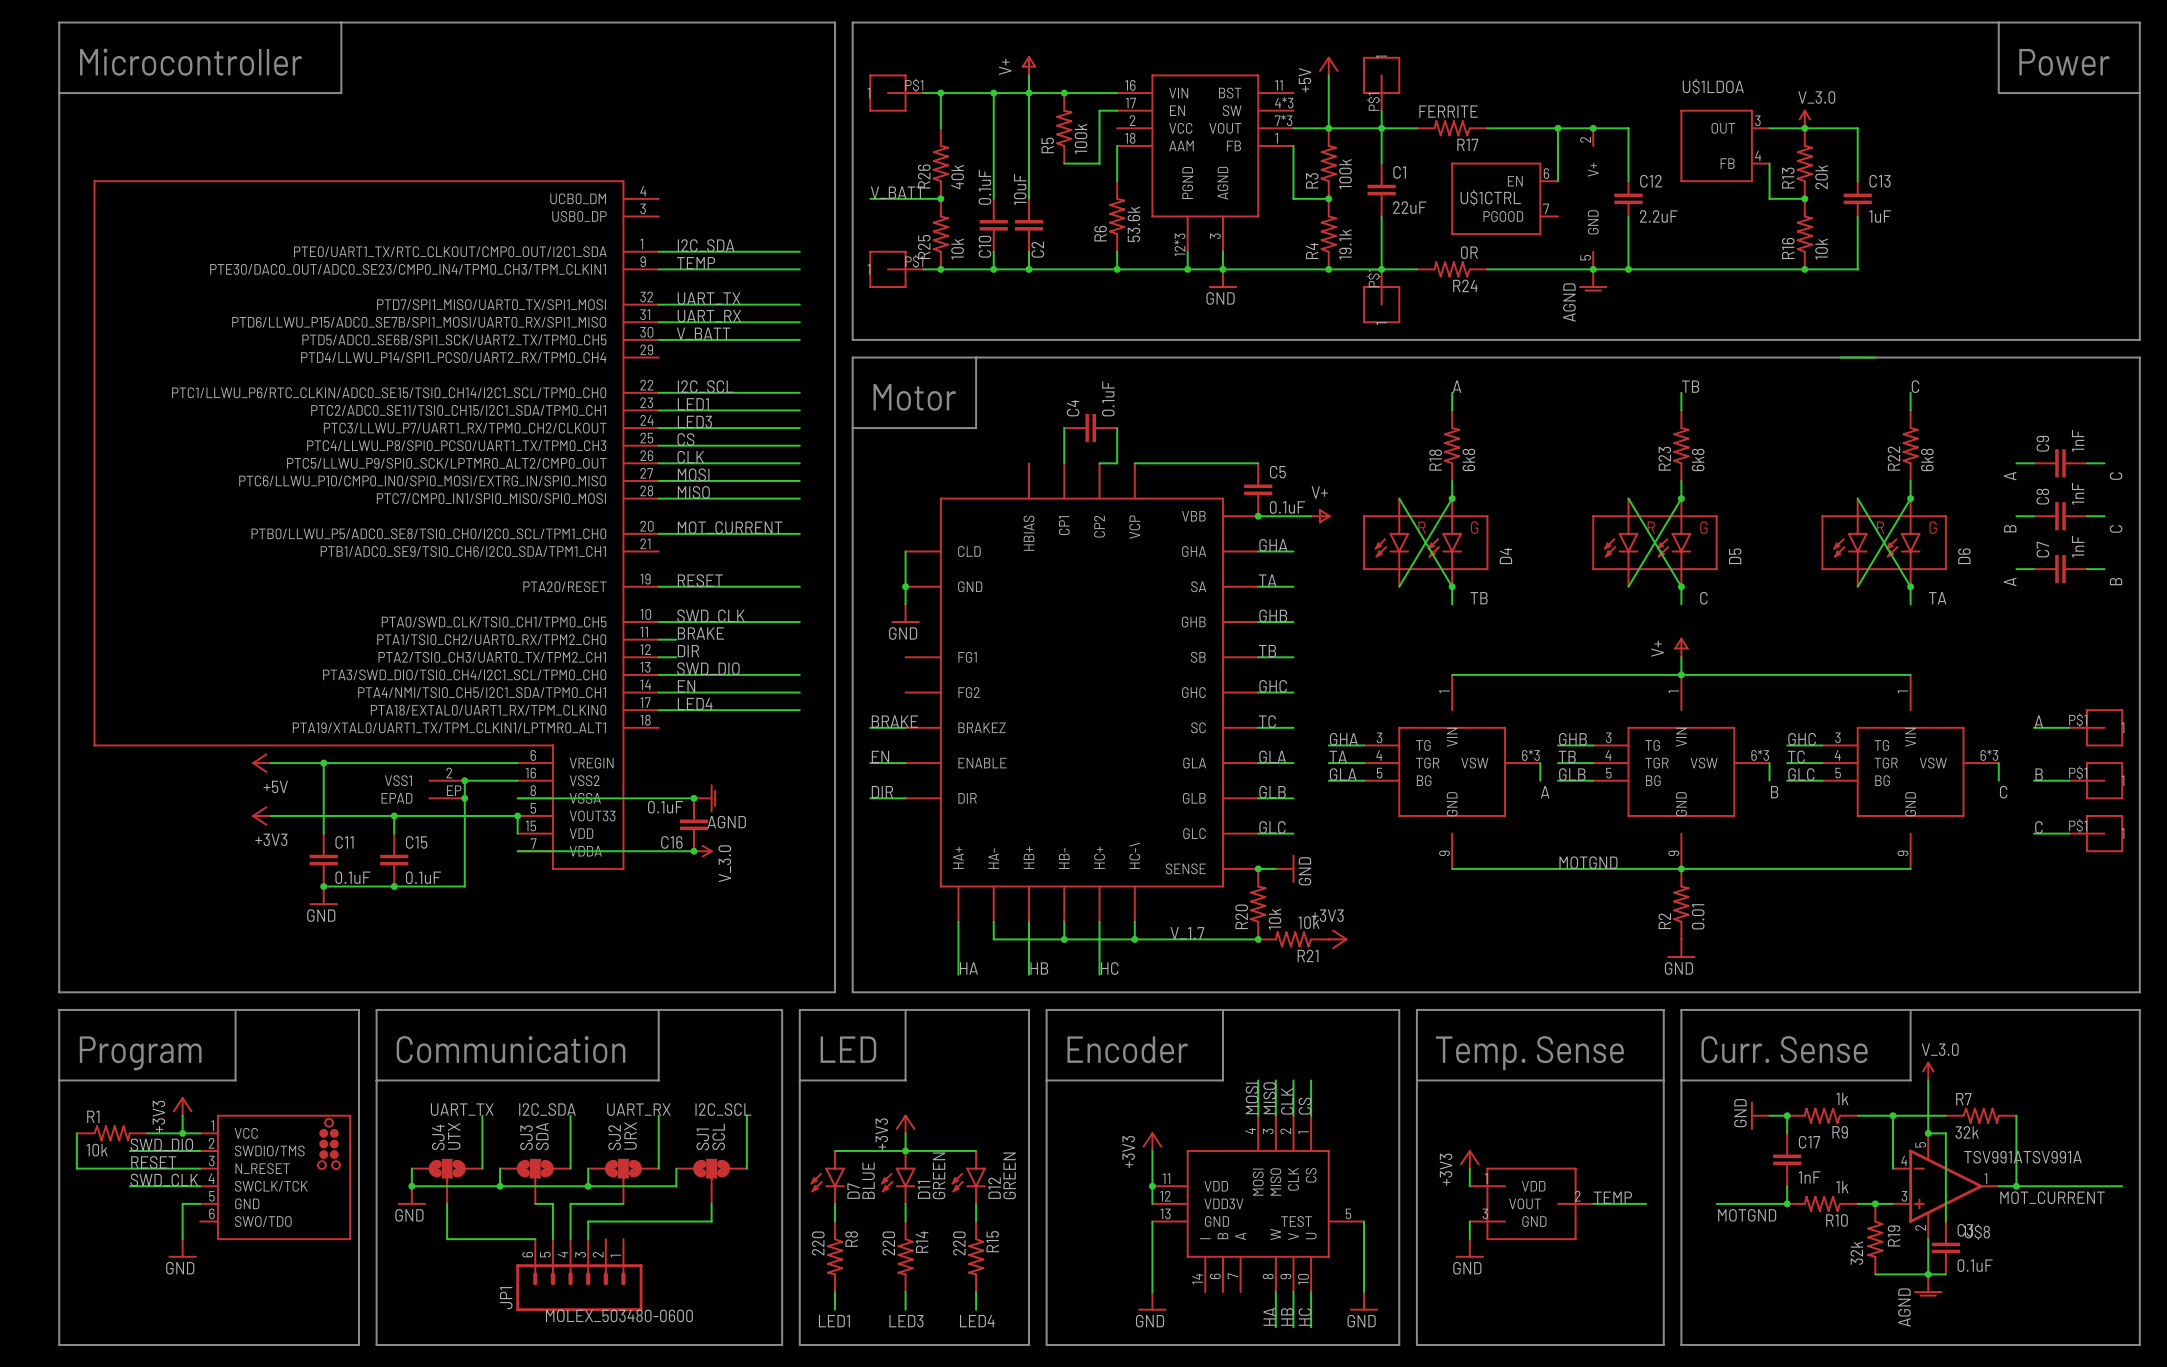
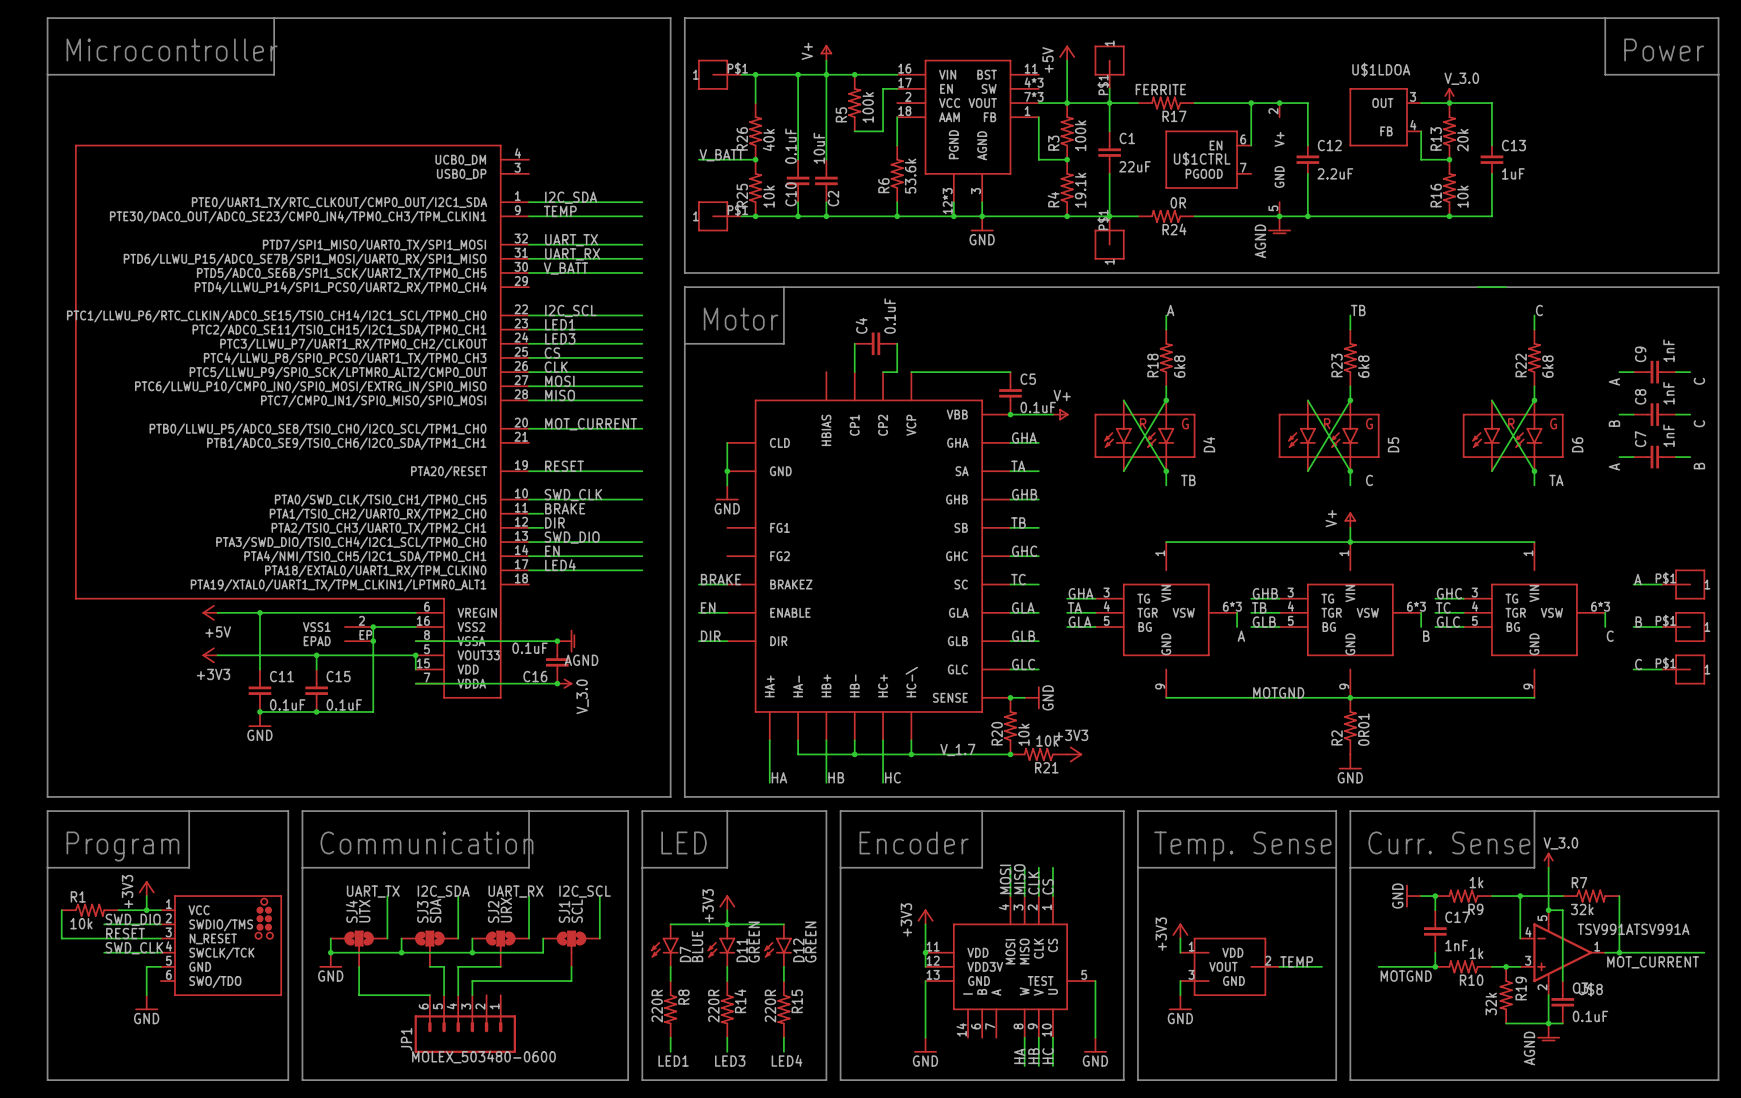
R2 value: 0.01 (1698, 916) -> 0R01 (1363, 729)
R8 value: 220 (818, 1243) -> 220R (657, 1006)
R14 value: 220 (888, 1243) -> 220R (713, 1006)
R15 value: 220 (959, 1243) -> 220R (770, 1006)

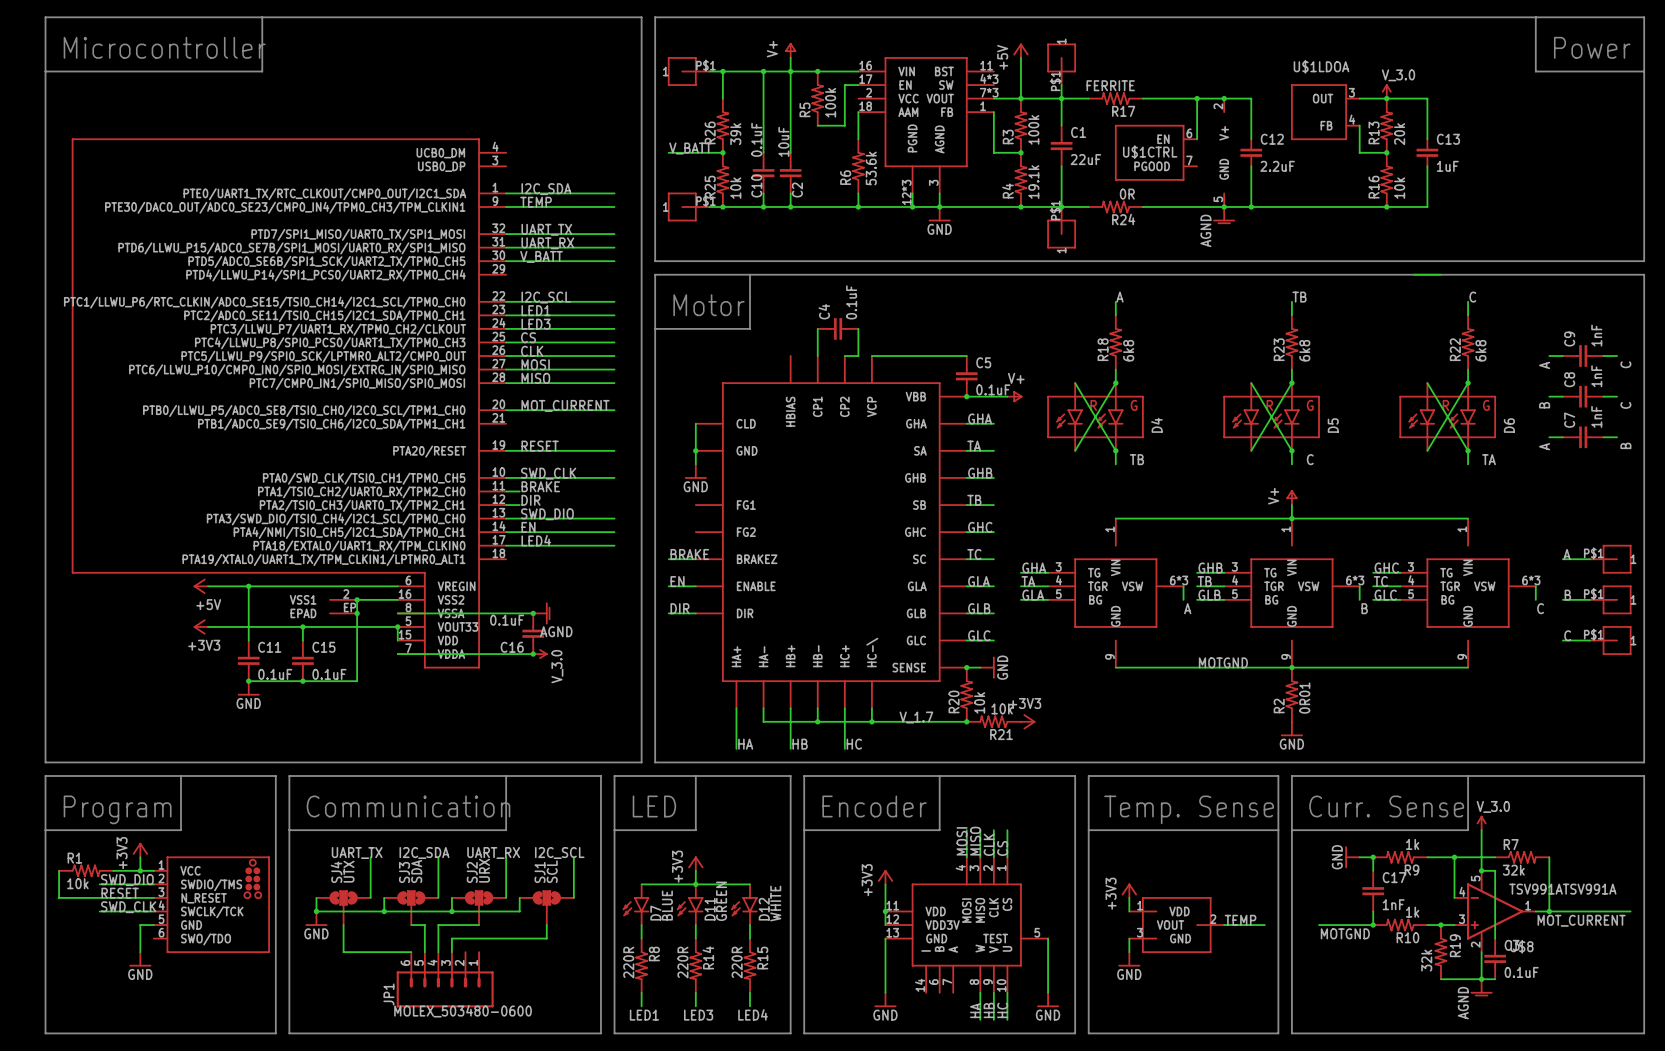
R26 value: 40k (768, 139) -> 39k (735, 134)
D12 value: GREEN (810, 942) -> WHITE (775, 903)

